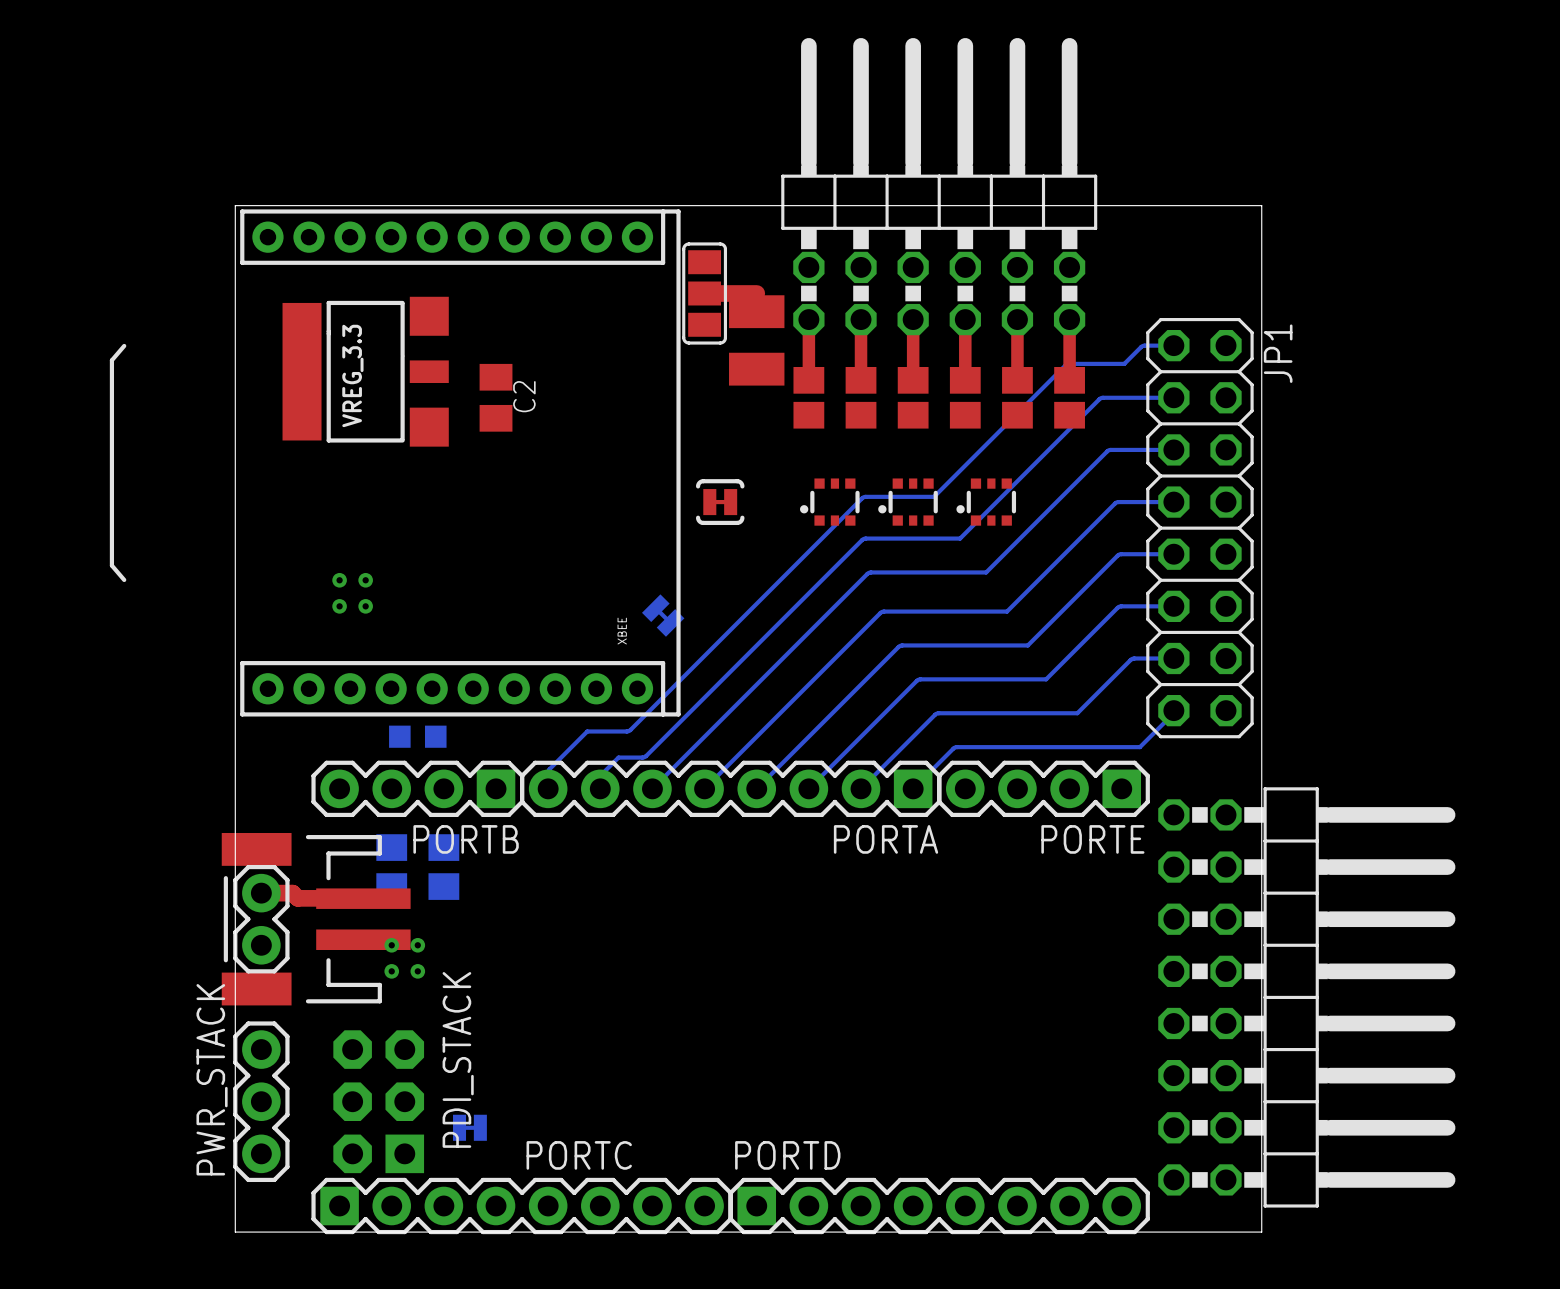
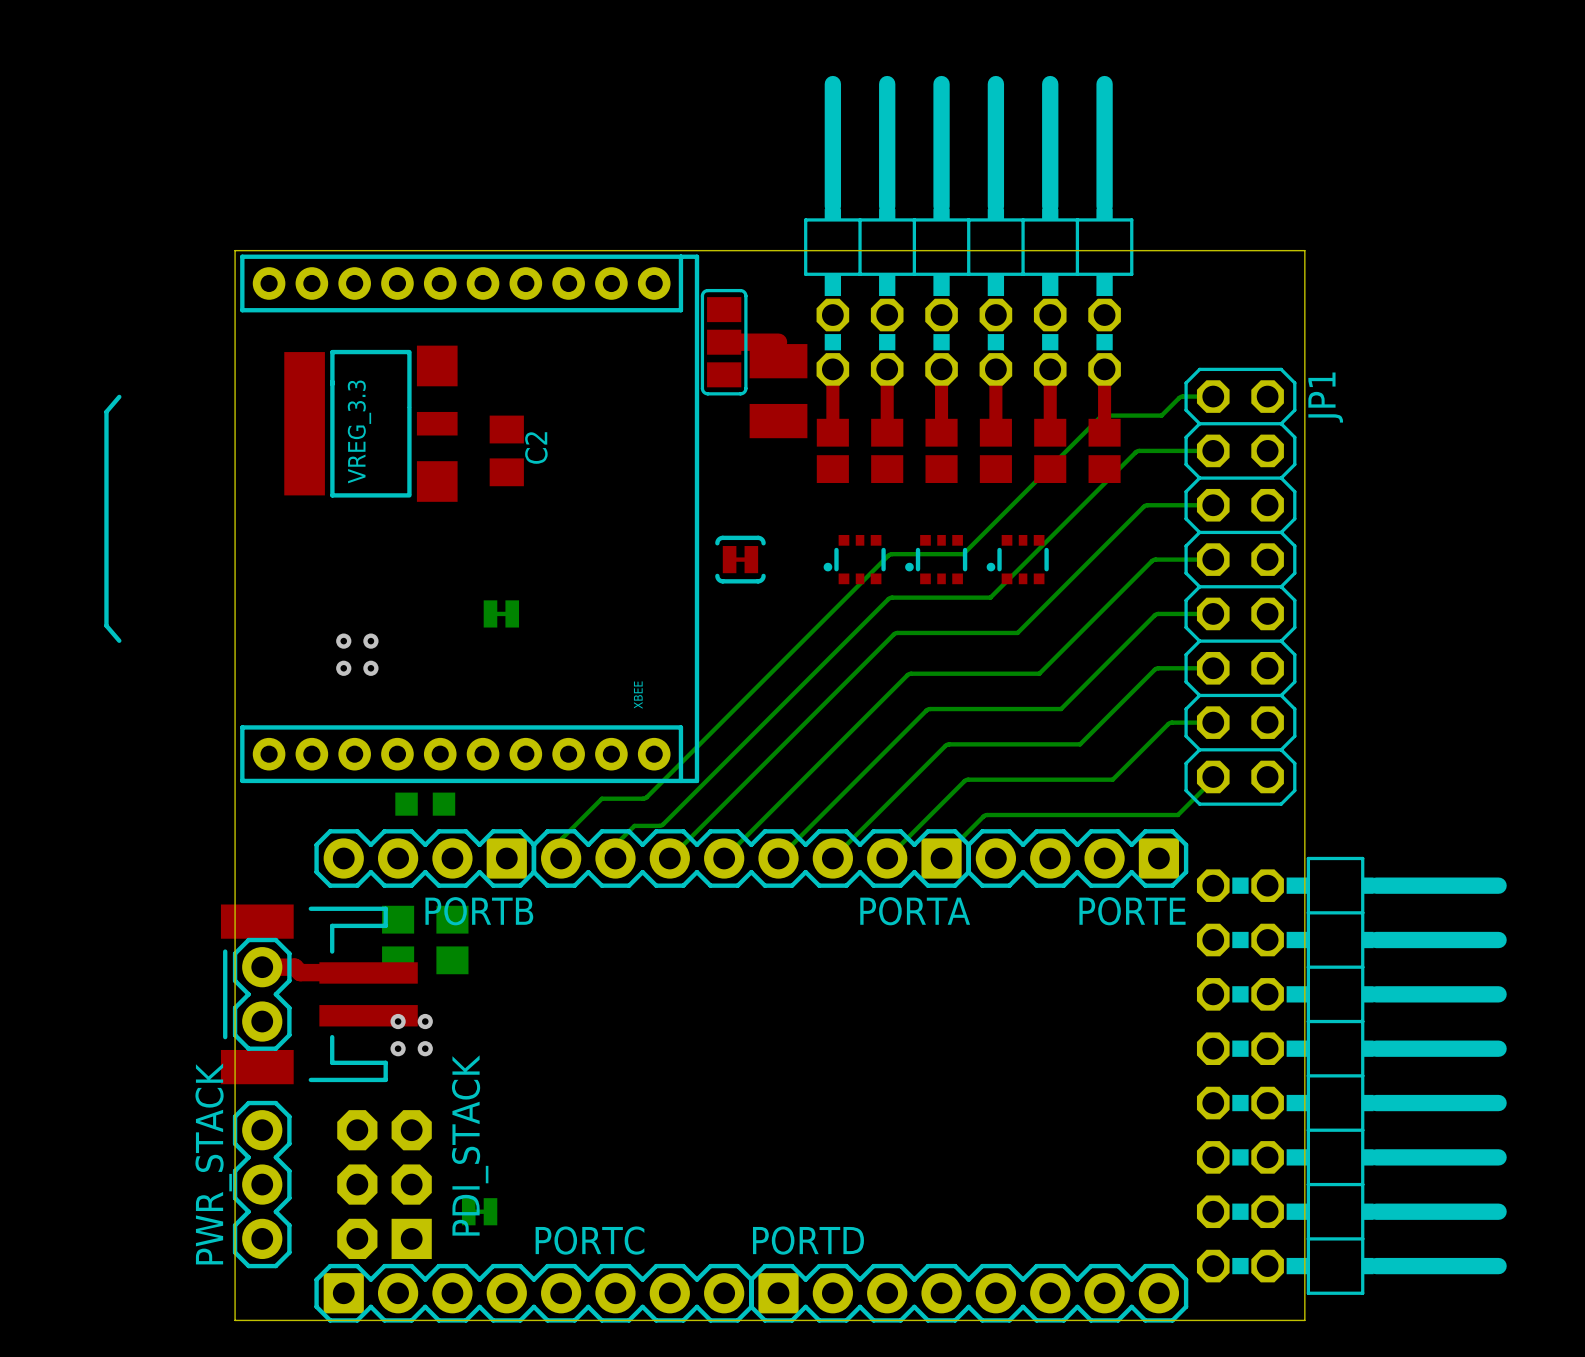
part: none -> (501, 613)
part: (663, 615) -> none

